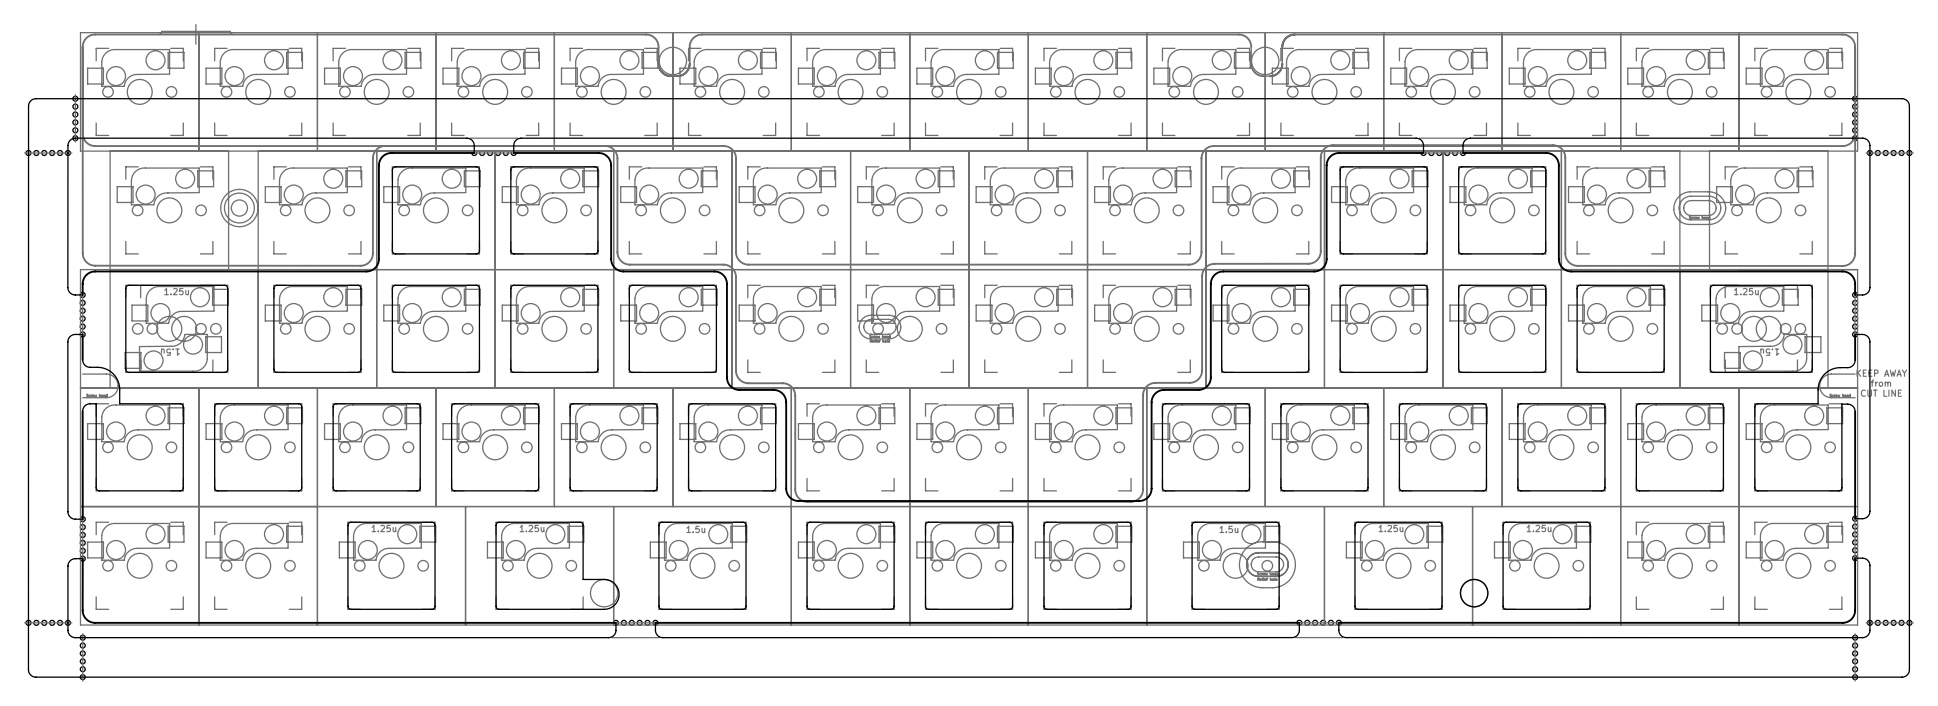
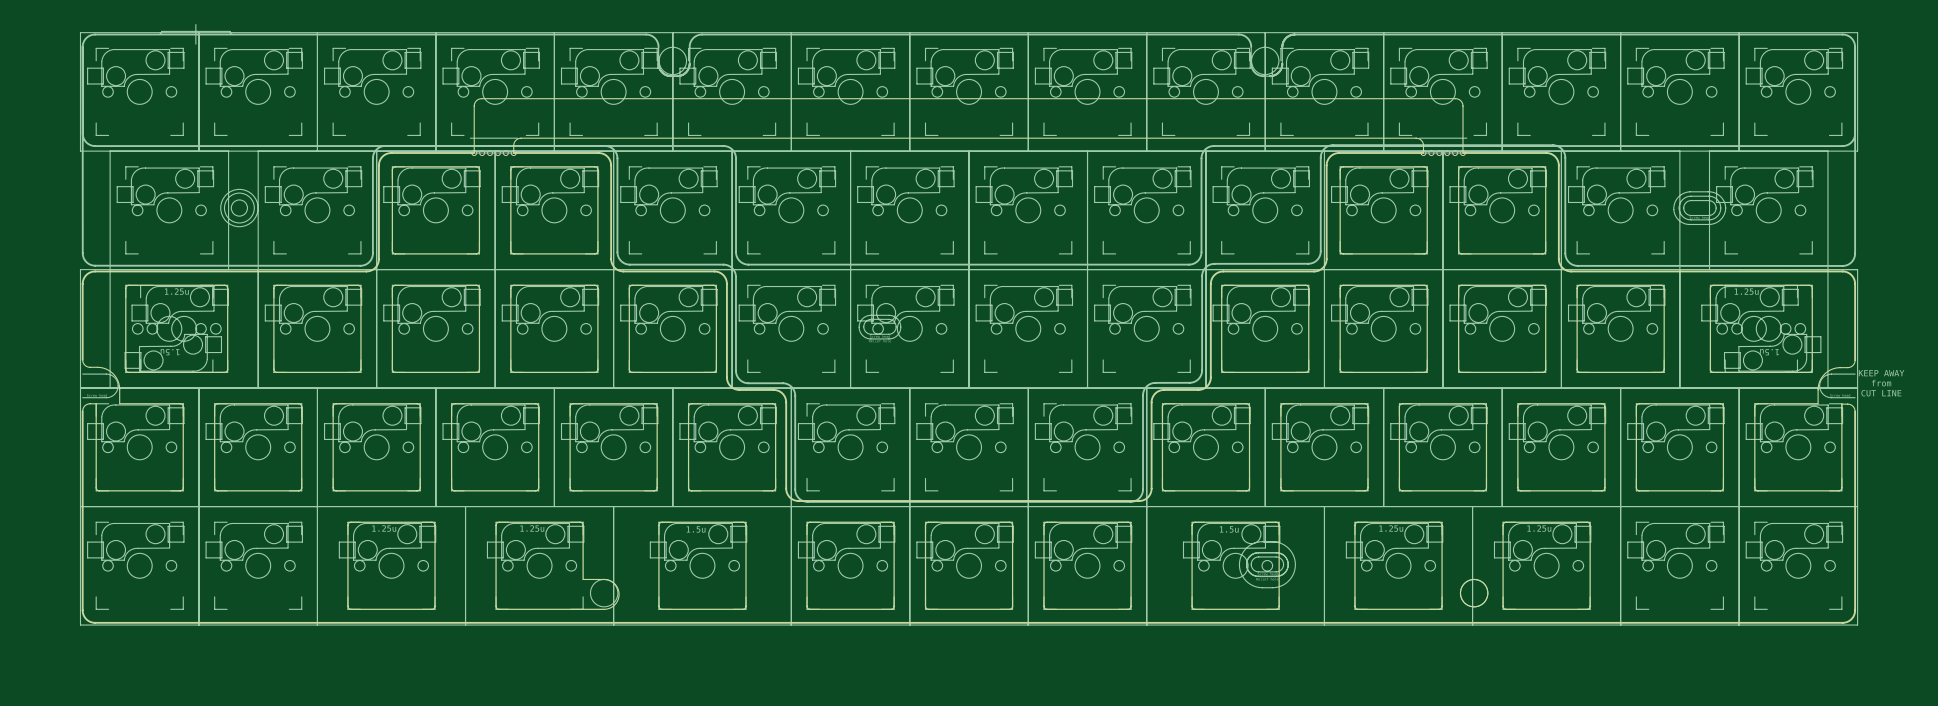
part: none -> (969, 324)
part: (968, 352) -> none

